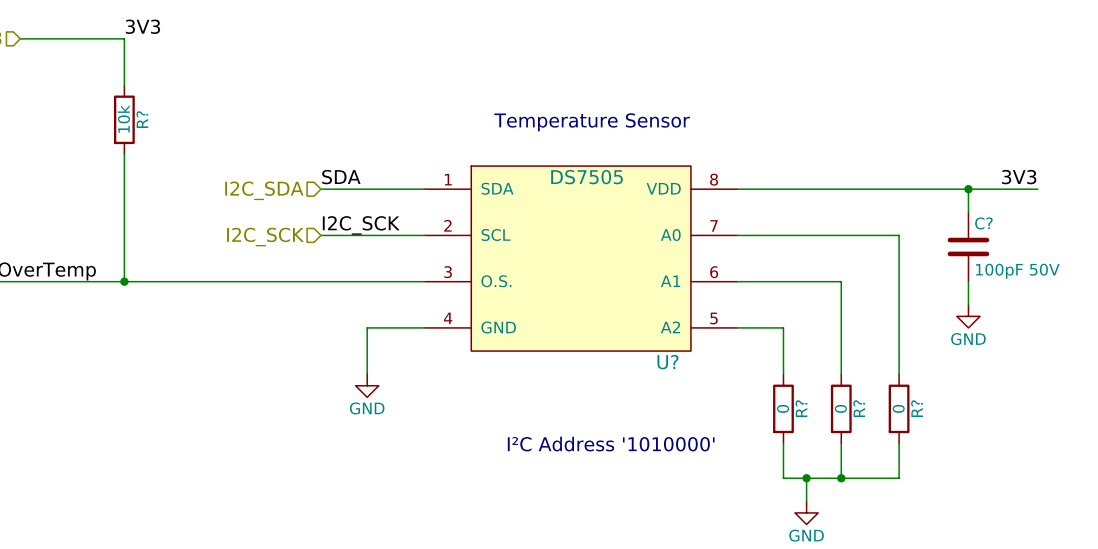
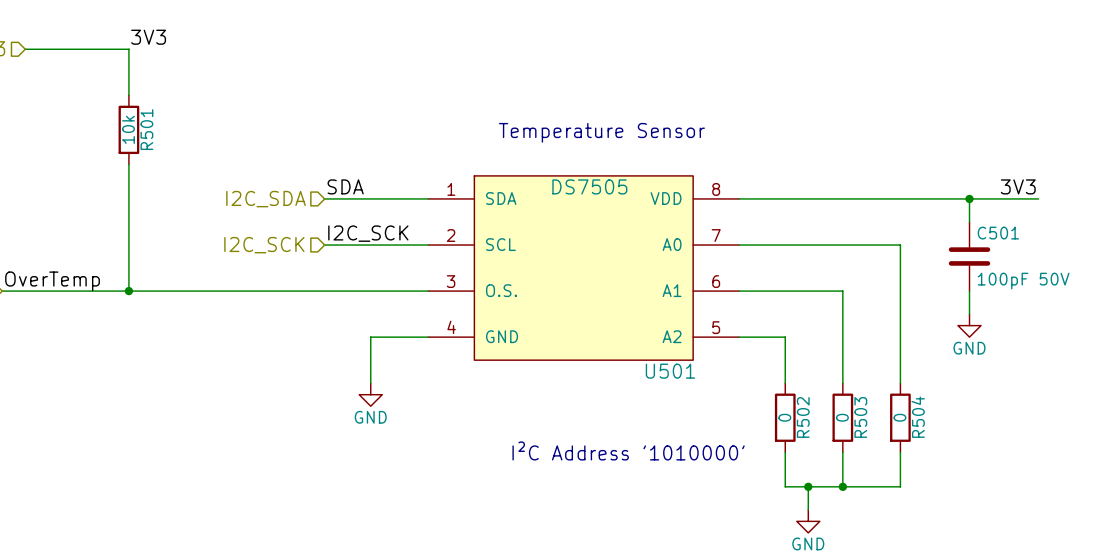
R? name: R? (142, 119) -> R501 (146, 129)
C? name: C? (983, 223) -> C501 (998, 233)
U? name: U? (668, 362) -> U501 (670, 371)
R? name: R? (801, 408) -> R502 (803, 417)
R? name: R? (859, 408) -> R503 (860, 417)
R? name: R? (917, 408) -> R504 (918, 417)

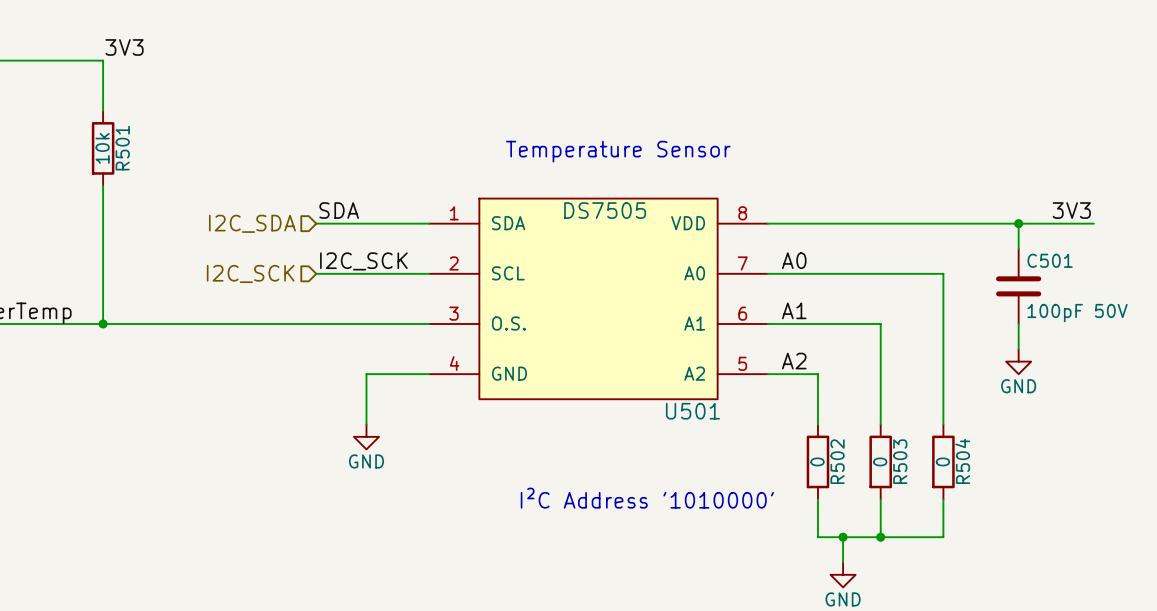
label: none -> A0 (794, 260)
label: none -> A1 (794, 310)
label: none -> A2 (794, 361)

